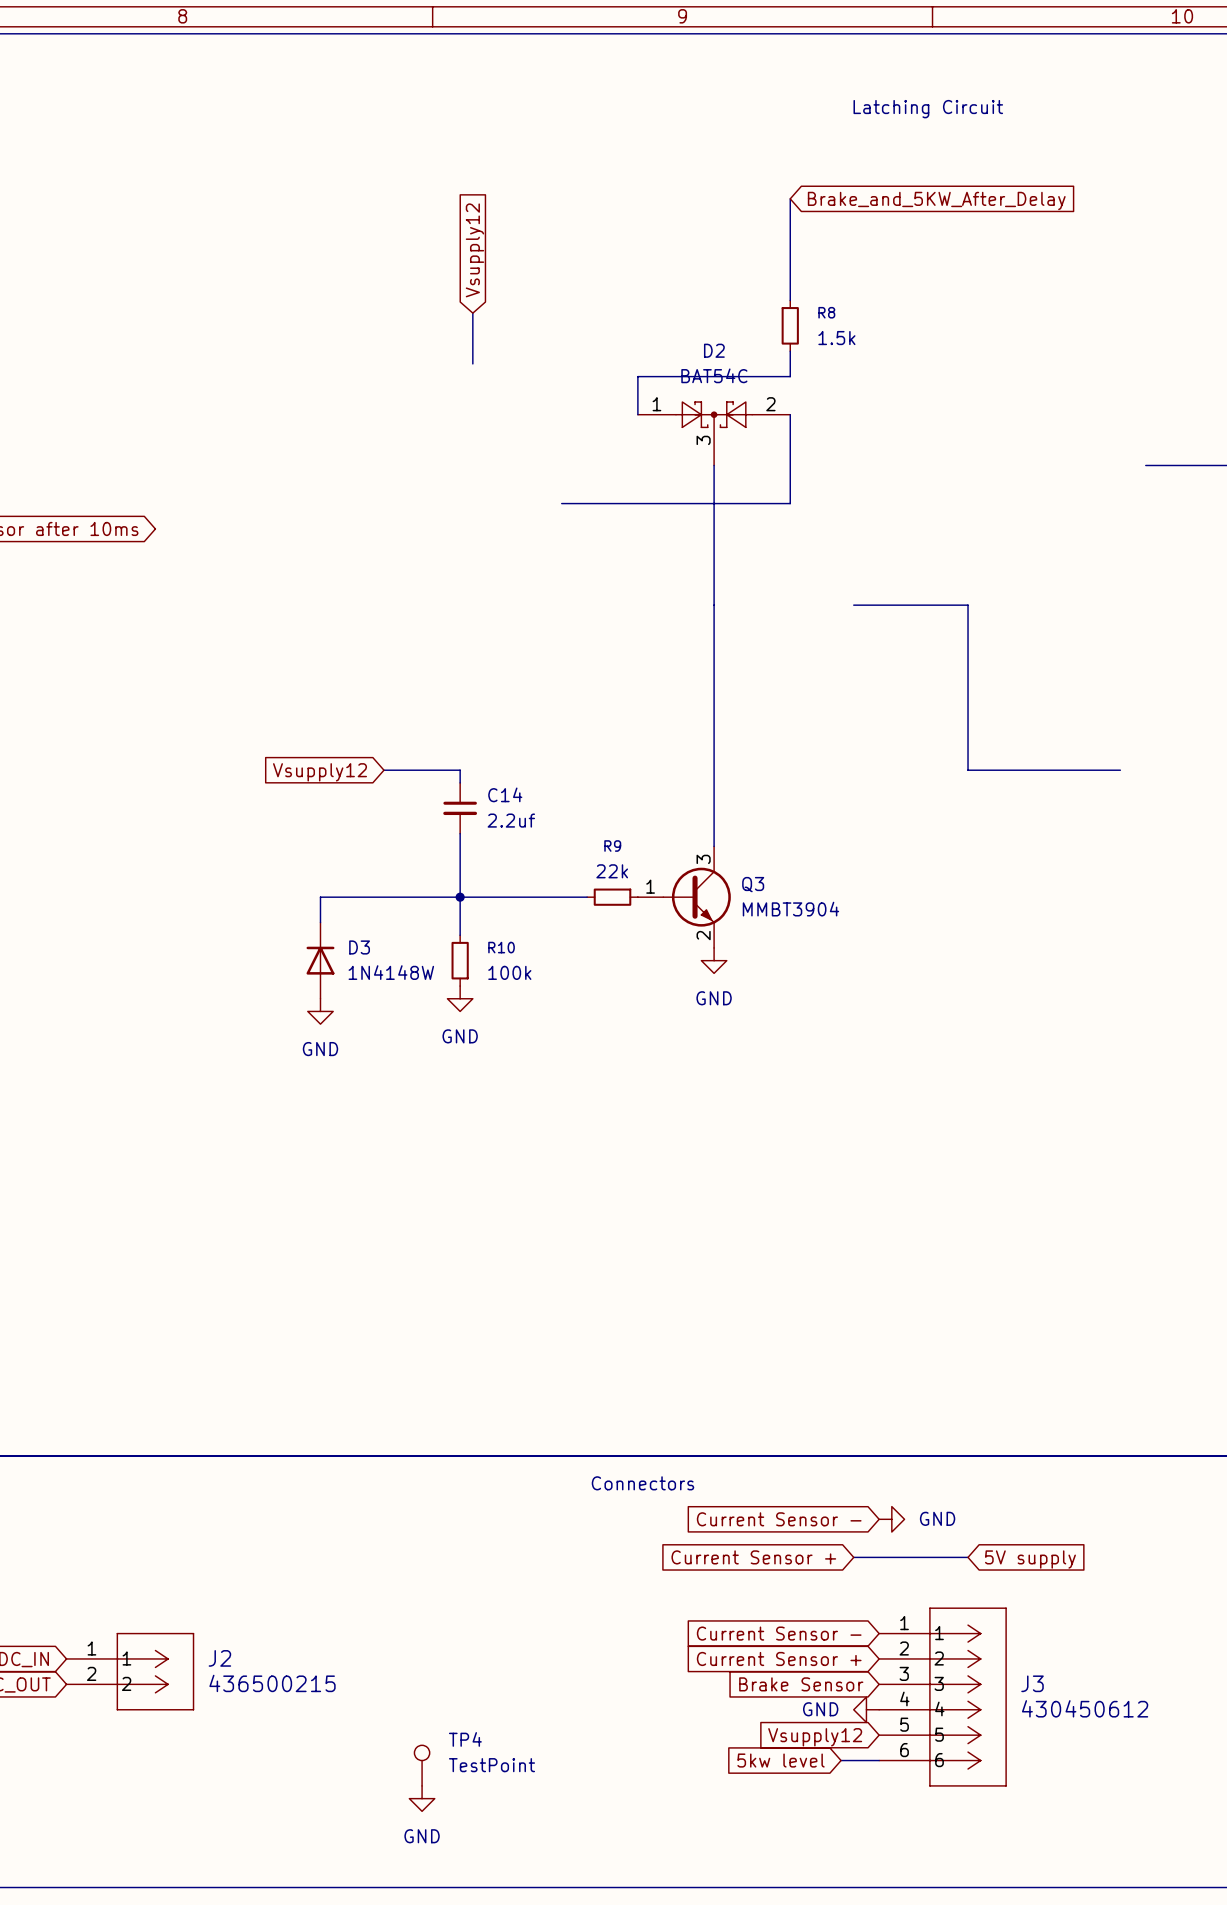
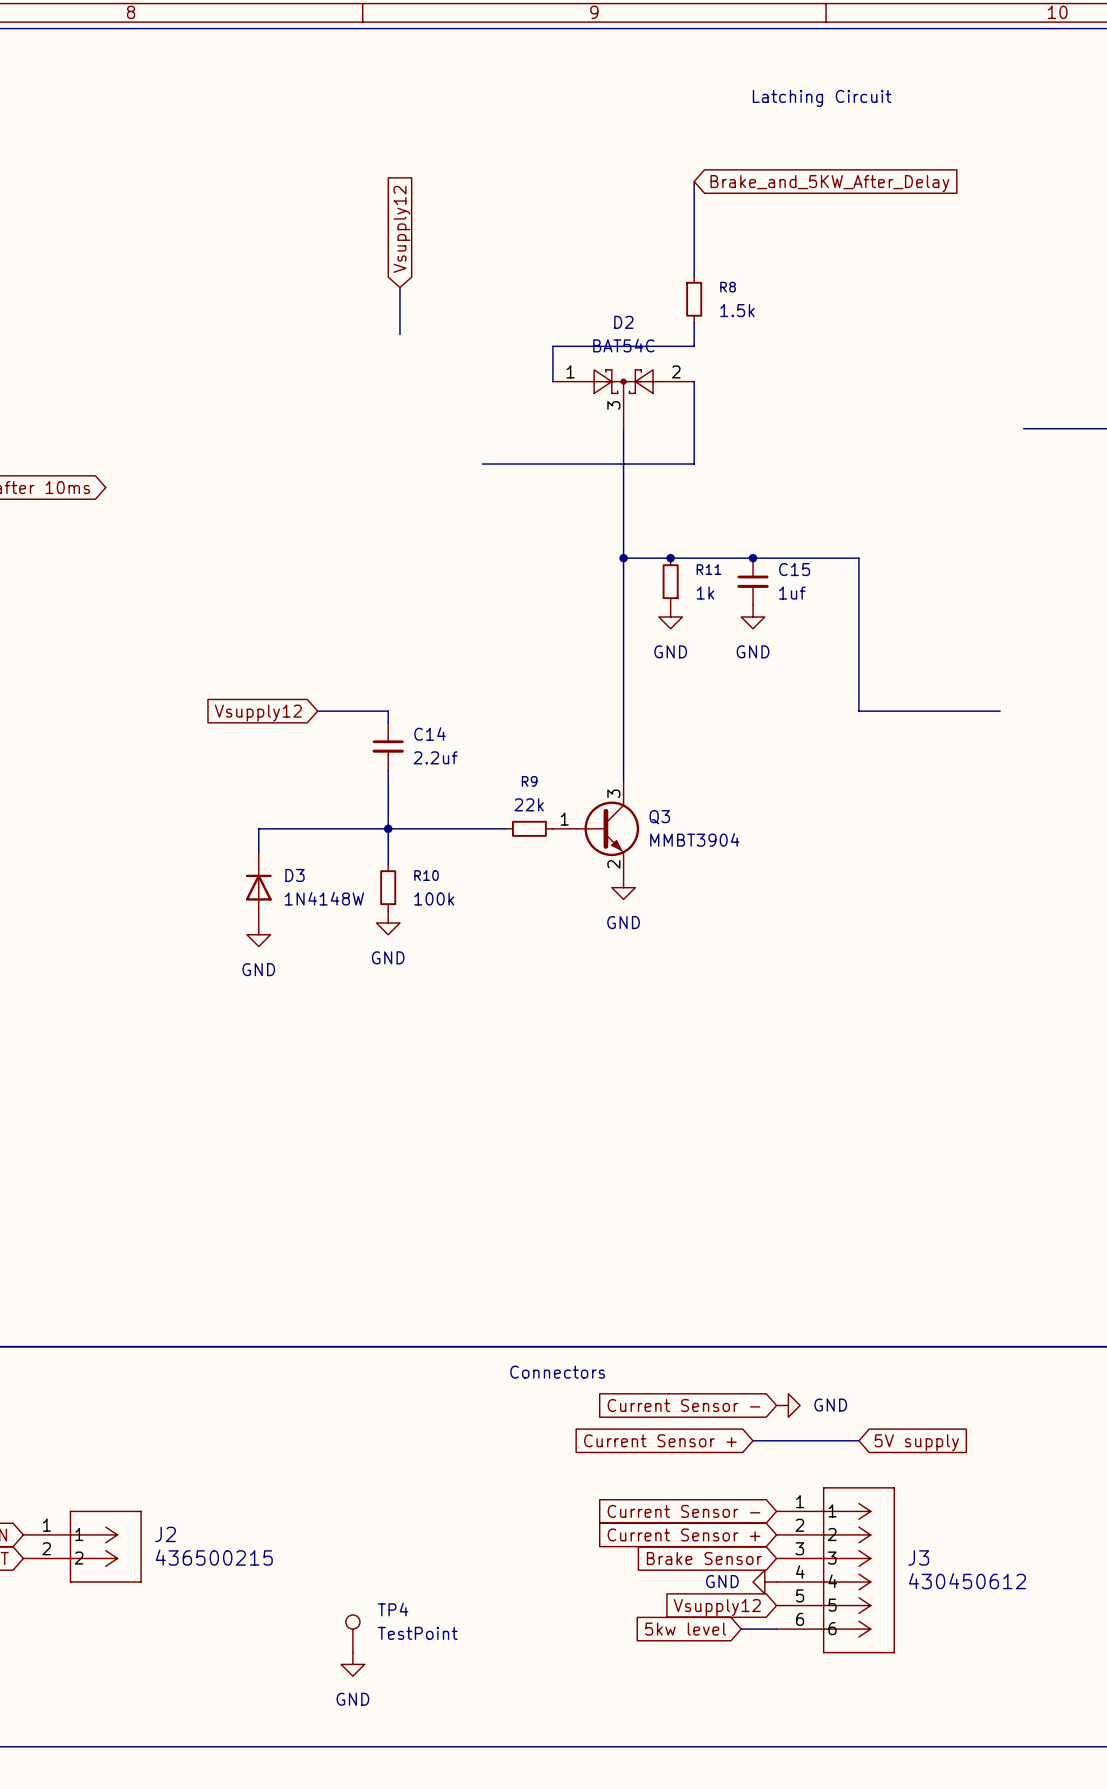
wire: none -> (623, 558) (753, 558)
junction: none -> (623, 558)
junction: none -> (670, 558)
junction: none -> (753, 558)
R11: none -> 1k (670, 581)
C15: none -> 1uf (753, 581)
power symbol: none -> GND (670, 617)
power symbol: none -> GND (753, 617)

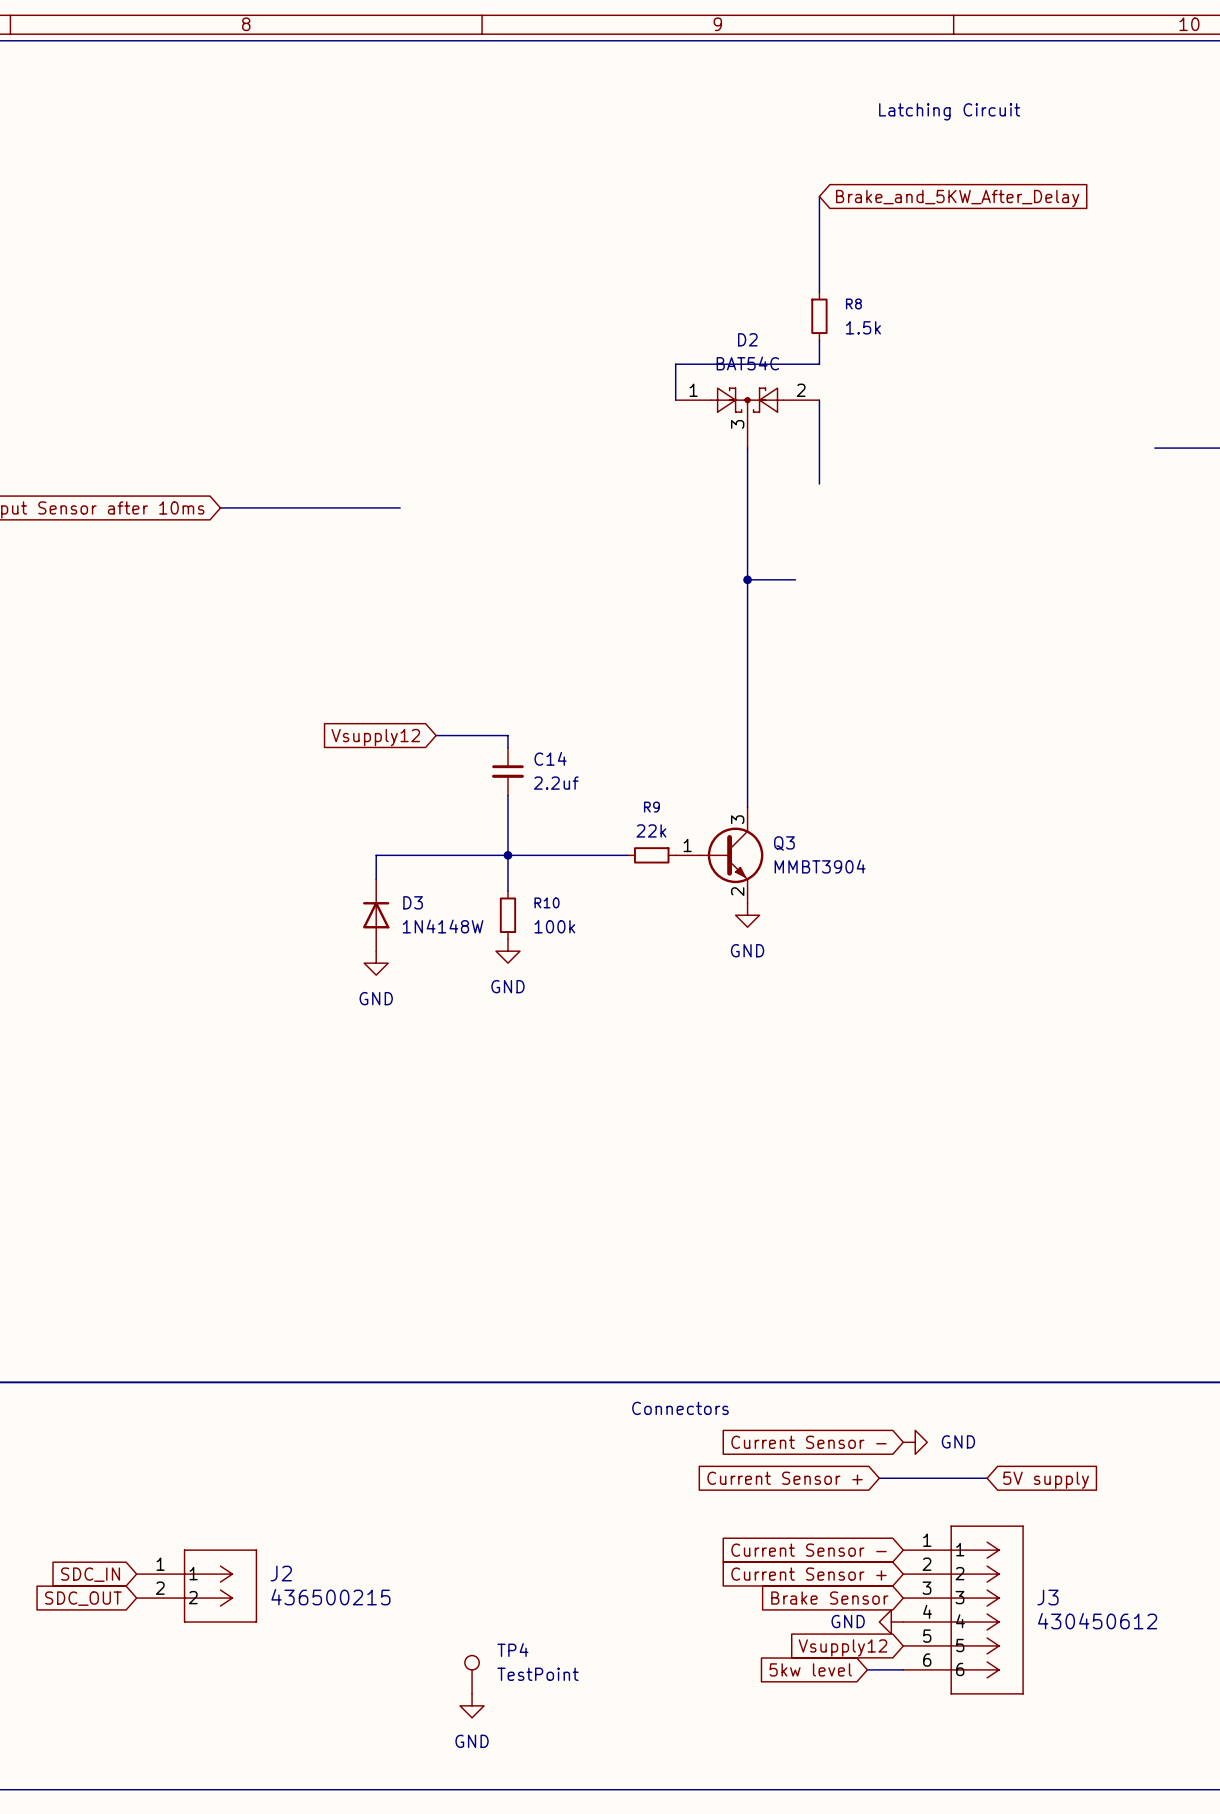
global label: Vsupply12 (401, 229) -> none
wire: (399, 287) (399, 334) -> none
wire: (482, 464) (694, 464) -> none
wire: none -> (220, 507) (400, 507)
wire: (670, 558) (858, 558) (858, 711) (1000, 711) -> none
junction: (670, 558) -> none
junction: (753, 558) -> none
R11: 1k (670, 581) -> none
C15: 1uf (753, 581) -> none
power symbol: GND (670, 617) -> none
power symbol: GND (753, 617) -> none

